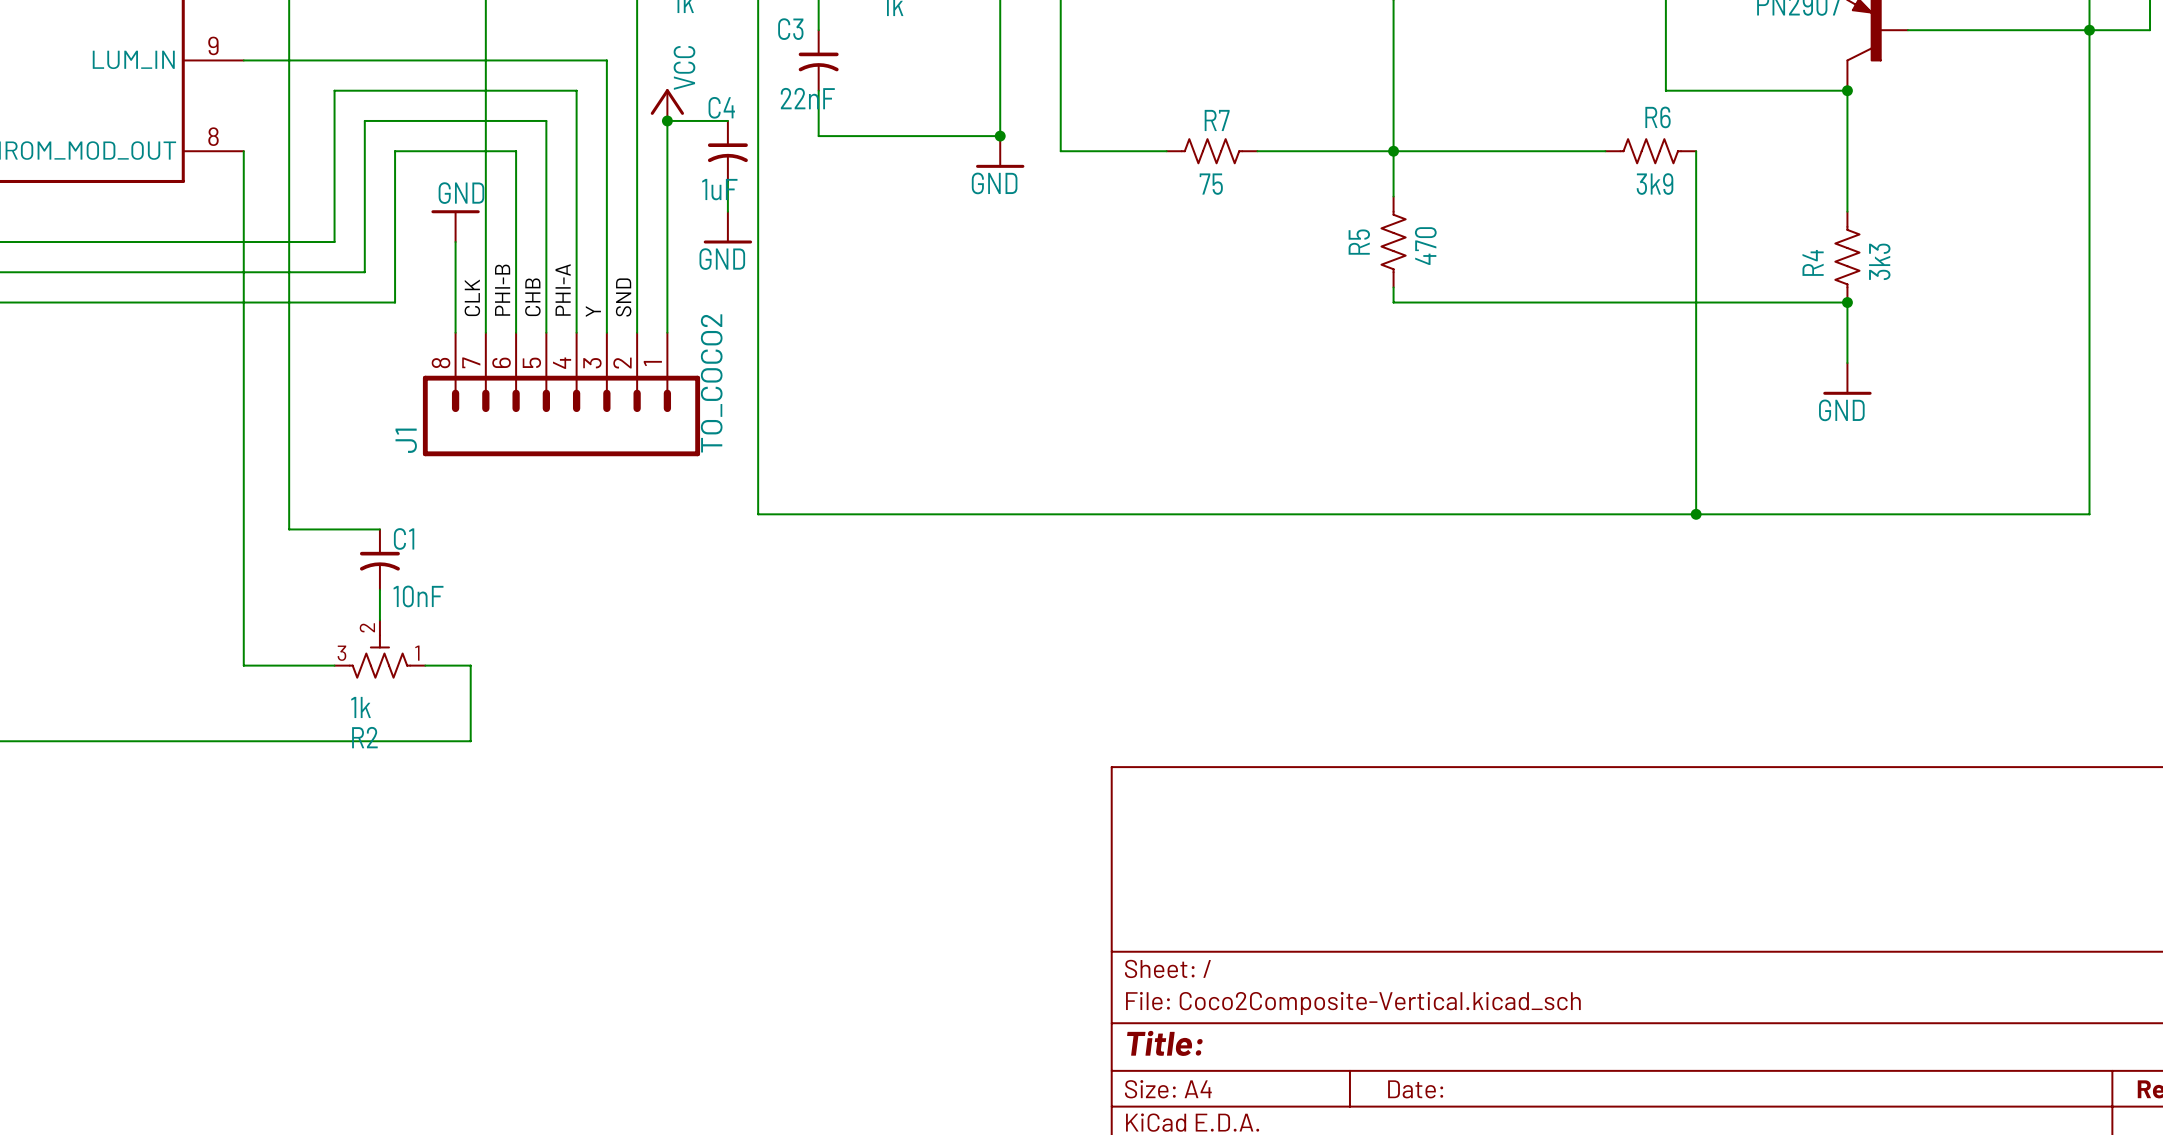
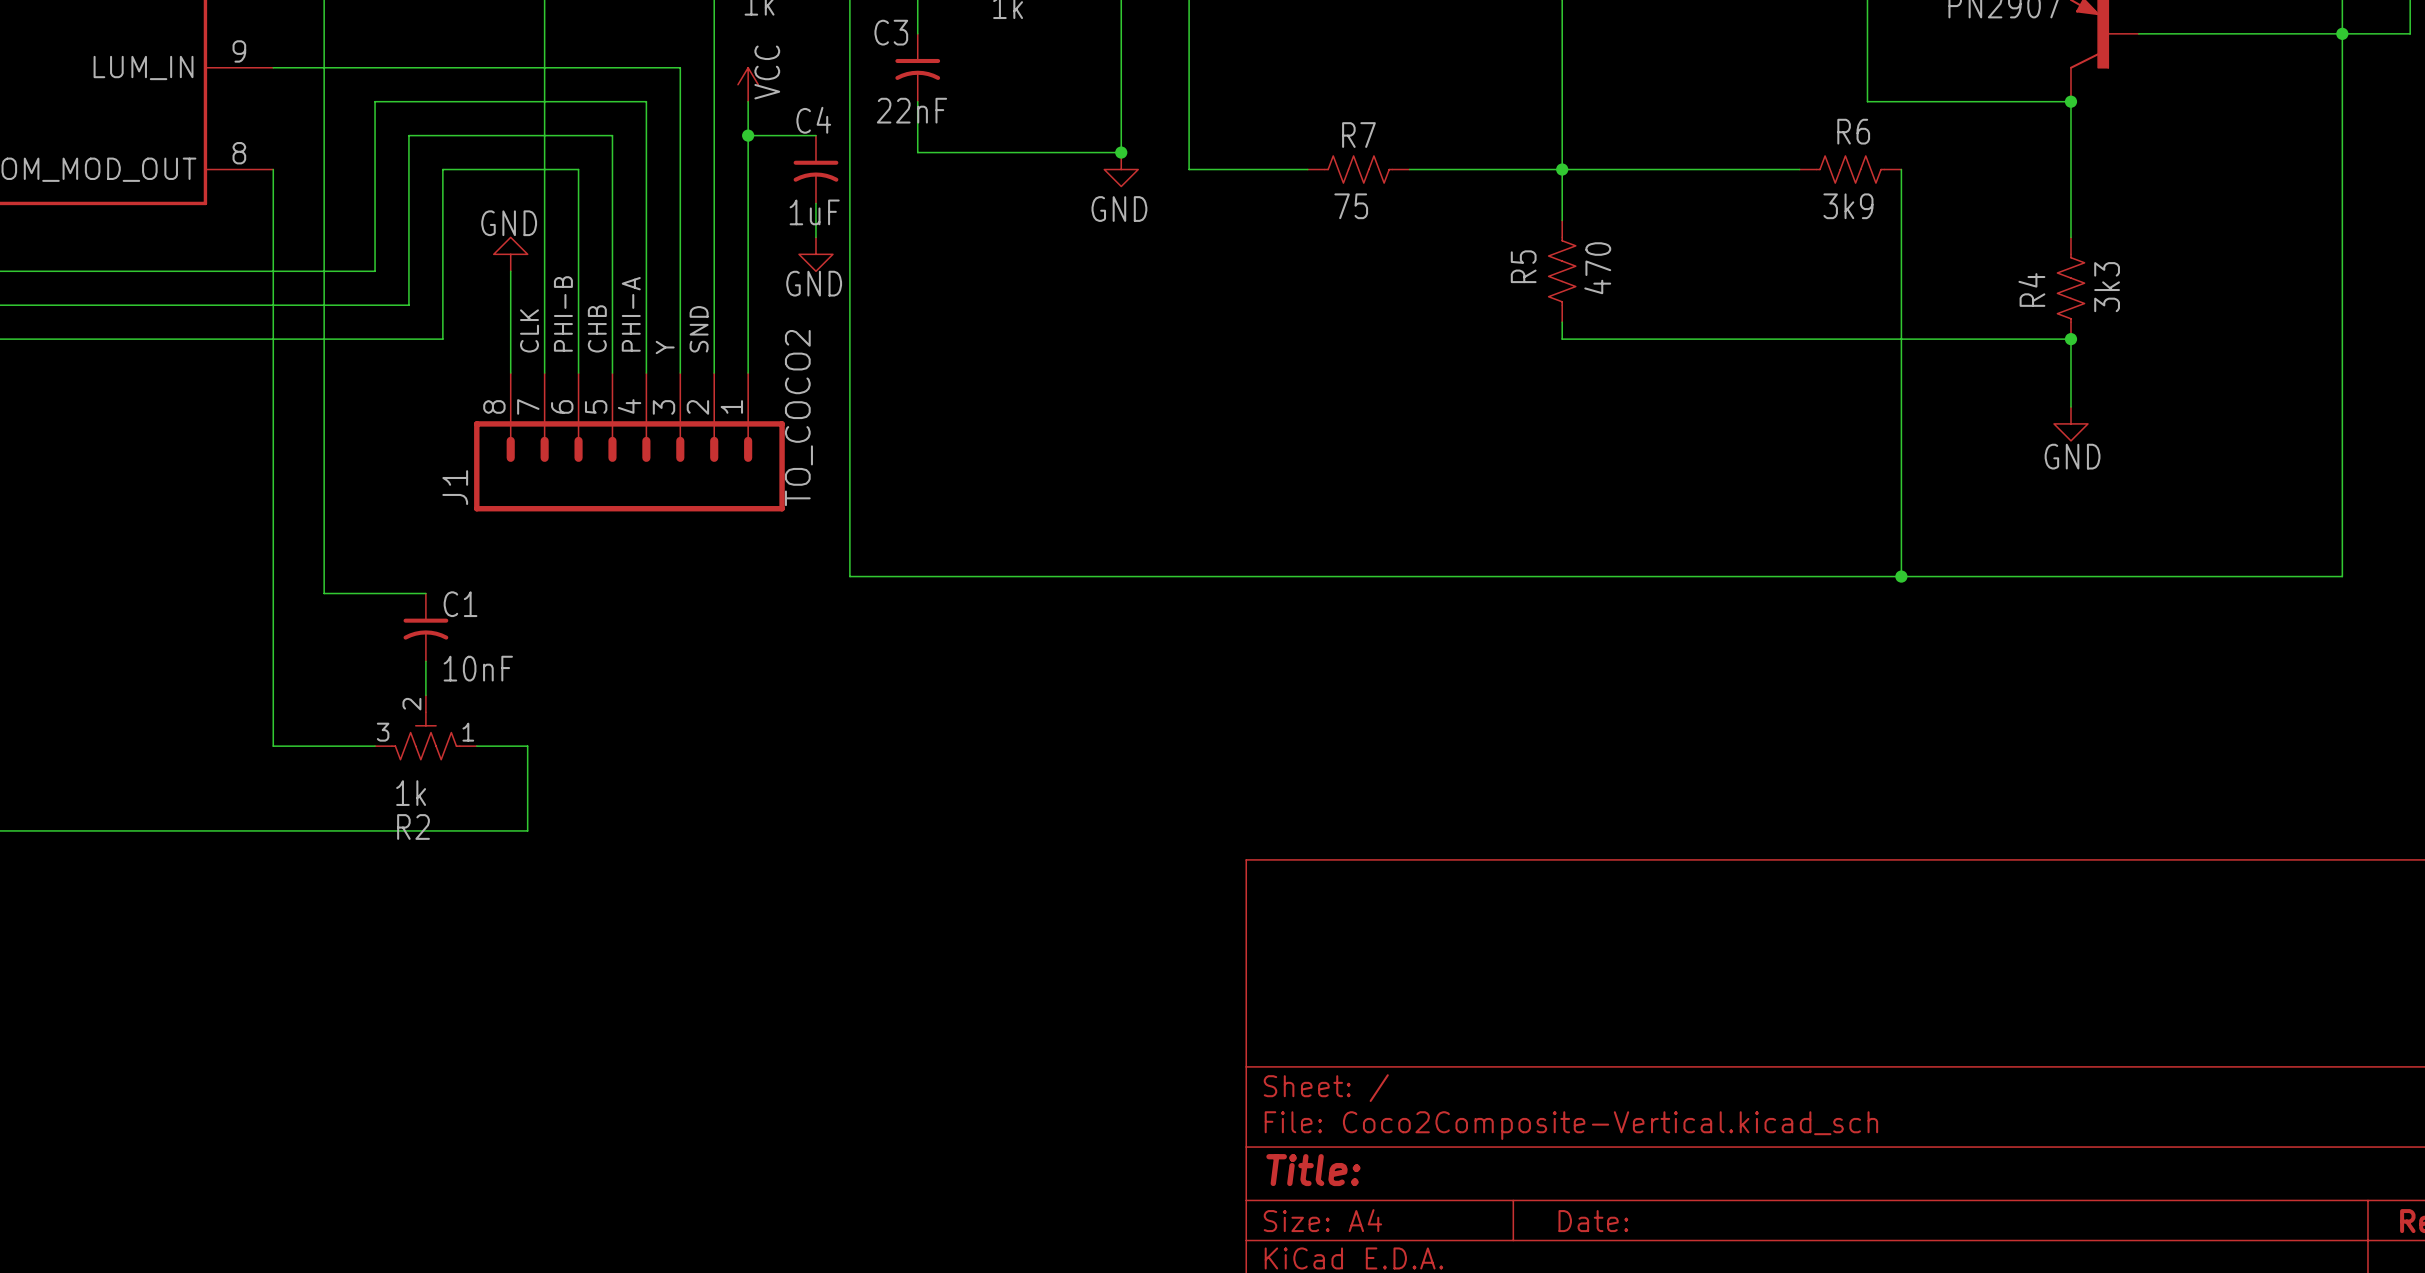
power symbol: none -> VCC (748, 84)
power symbol: VCC (667, 105) -> none
power symbol shape: [976, 136, 1025, 168] -> [1104, 152, 1139, 187]
power symbol shape: [431, 210, 480, 243] -> [493, 237, 528, 272]
power symbol shape: [703, 211, 753, 244] -> [799, 237, 833, 272]
power symbol shape: [1823, 363, 1872, 395] -> [2054, 406, 2088, 441]

